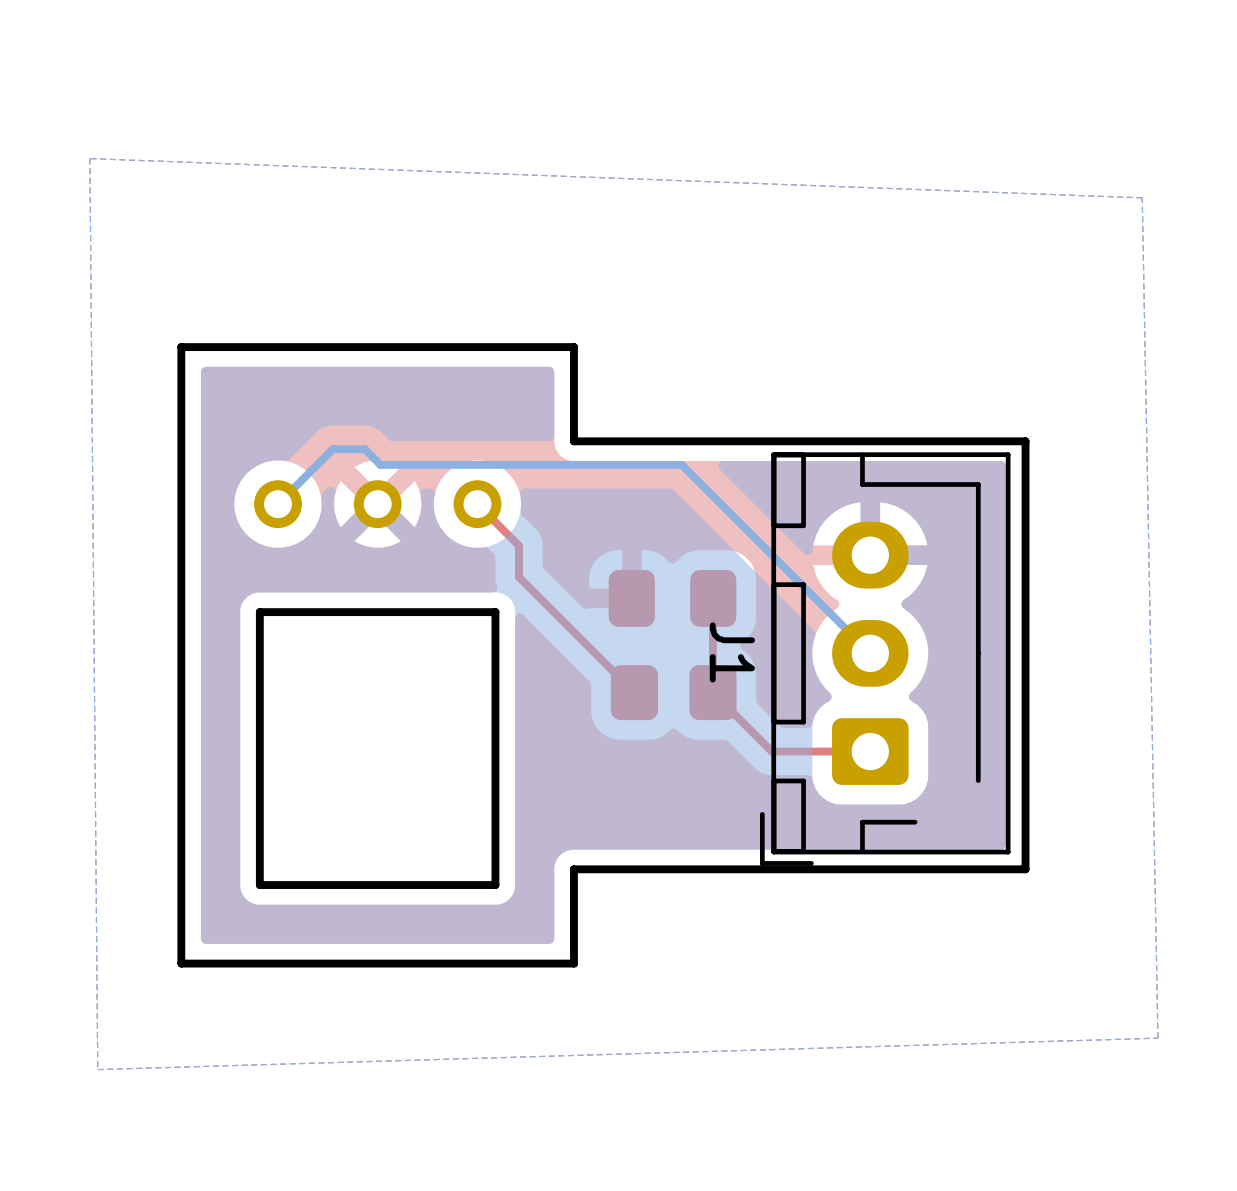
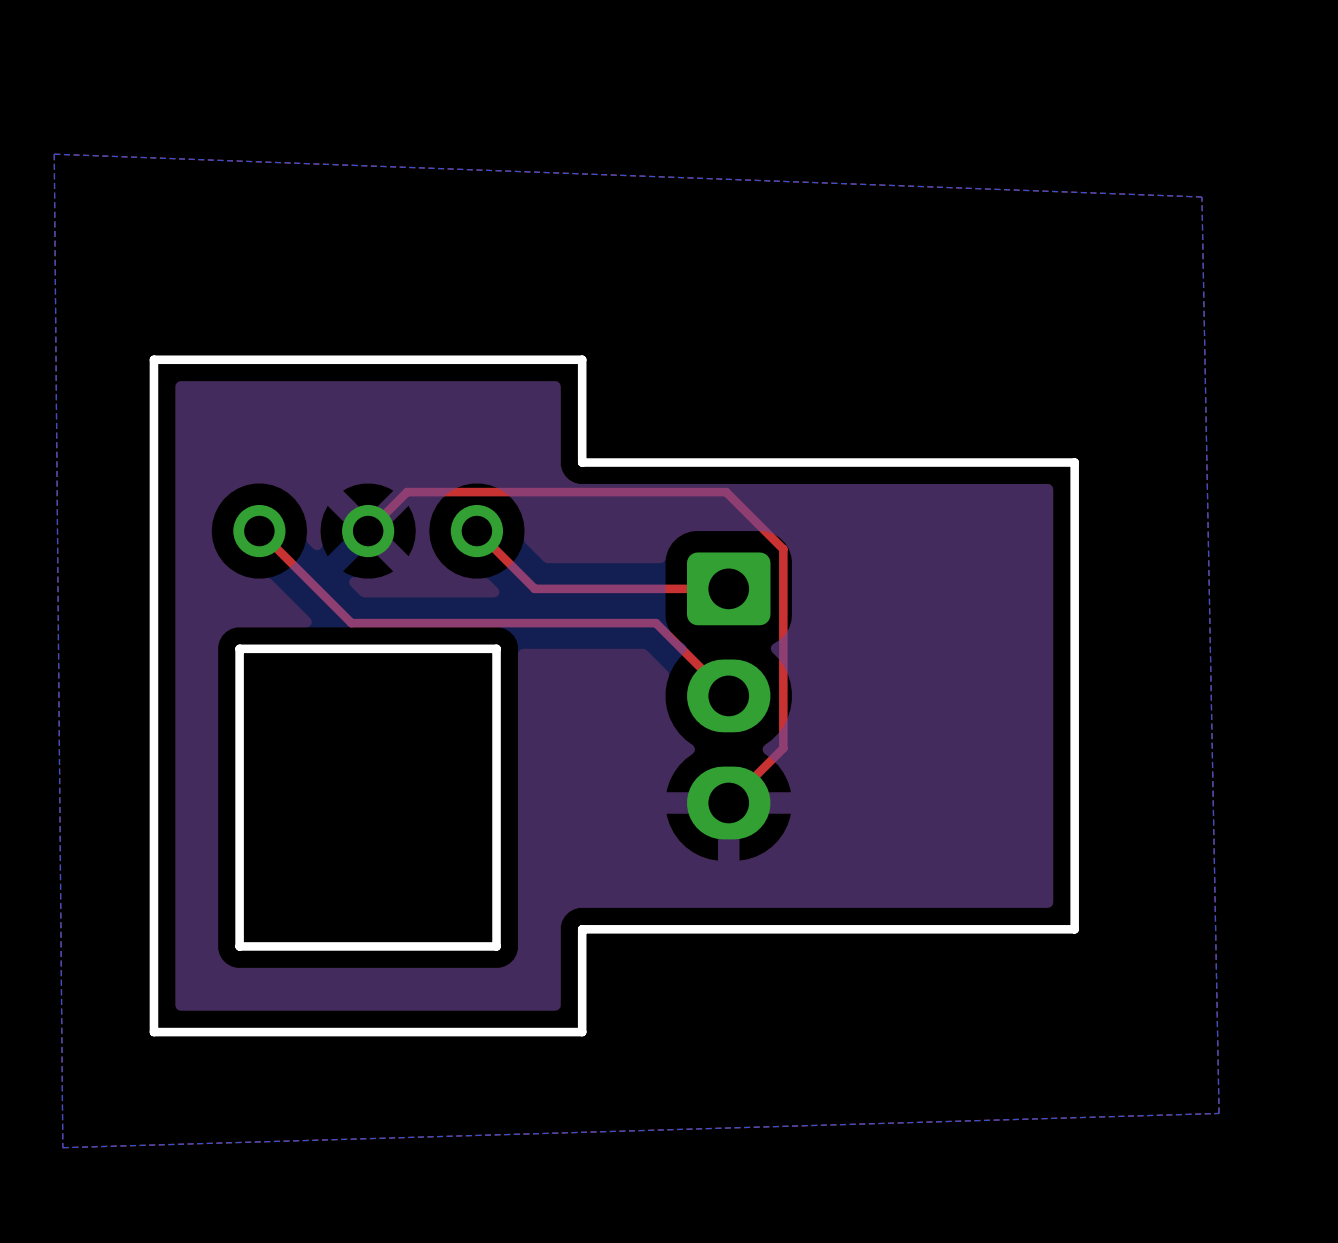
bottom track: (277, 504) (332, 449) (364, 449) (380, 464) (681, 464) (870, 653) -> none
top track: none -> (259, 531) (351, 623) (655, 623) (728, 695)
top track: none -> (368, 531) (407, 492) (726, 492) (783, 549) (783, 748) (728, 802)
top track: (519, 545) (519, 577) (634, 692) -> (522, 576) (534, 588) (728, 588)
part: (672, 598) -> none
top track: (712, 598) (712, 692) (771, 751) (870, 751) -> none
J1 side: bottom (885, 659) -> top (728, 695)
part: (673, 692) -> none

